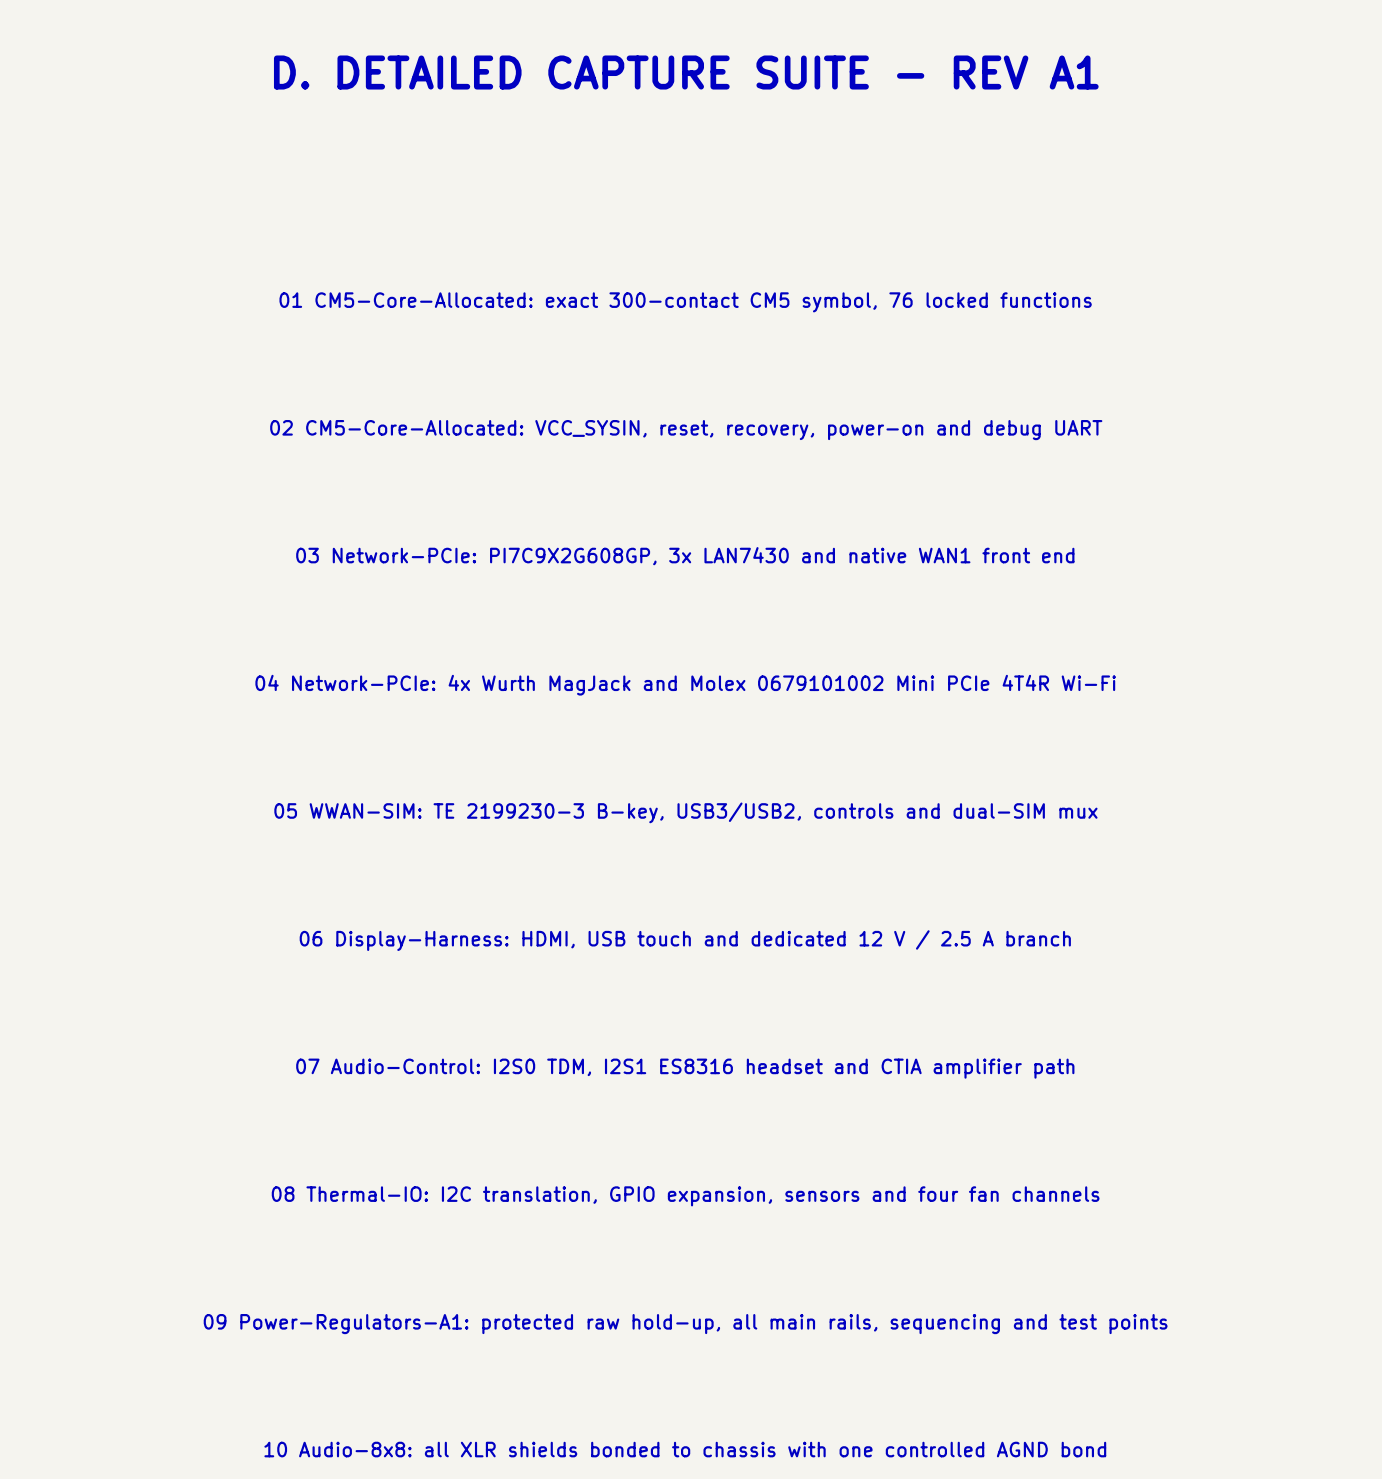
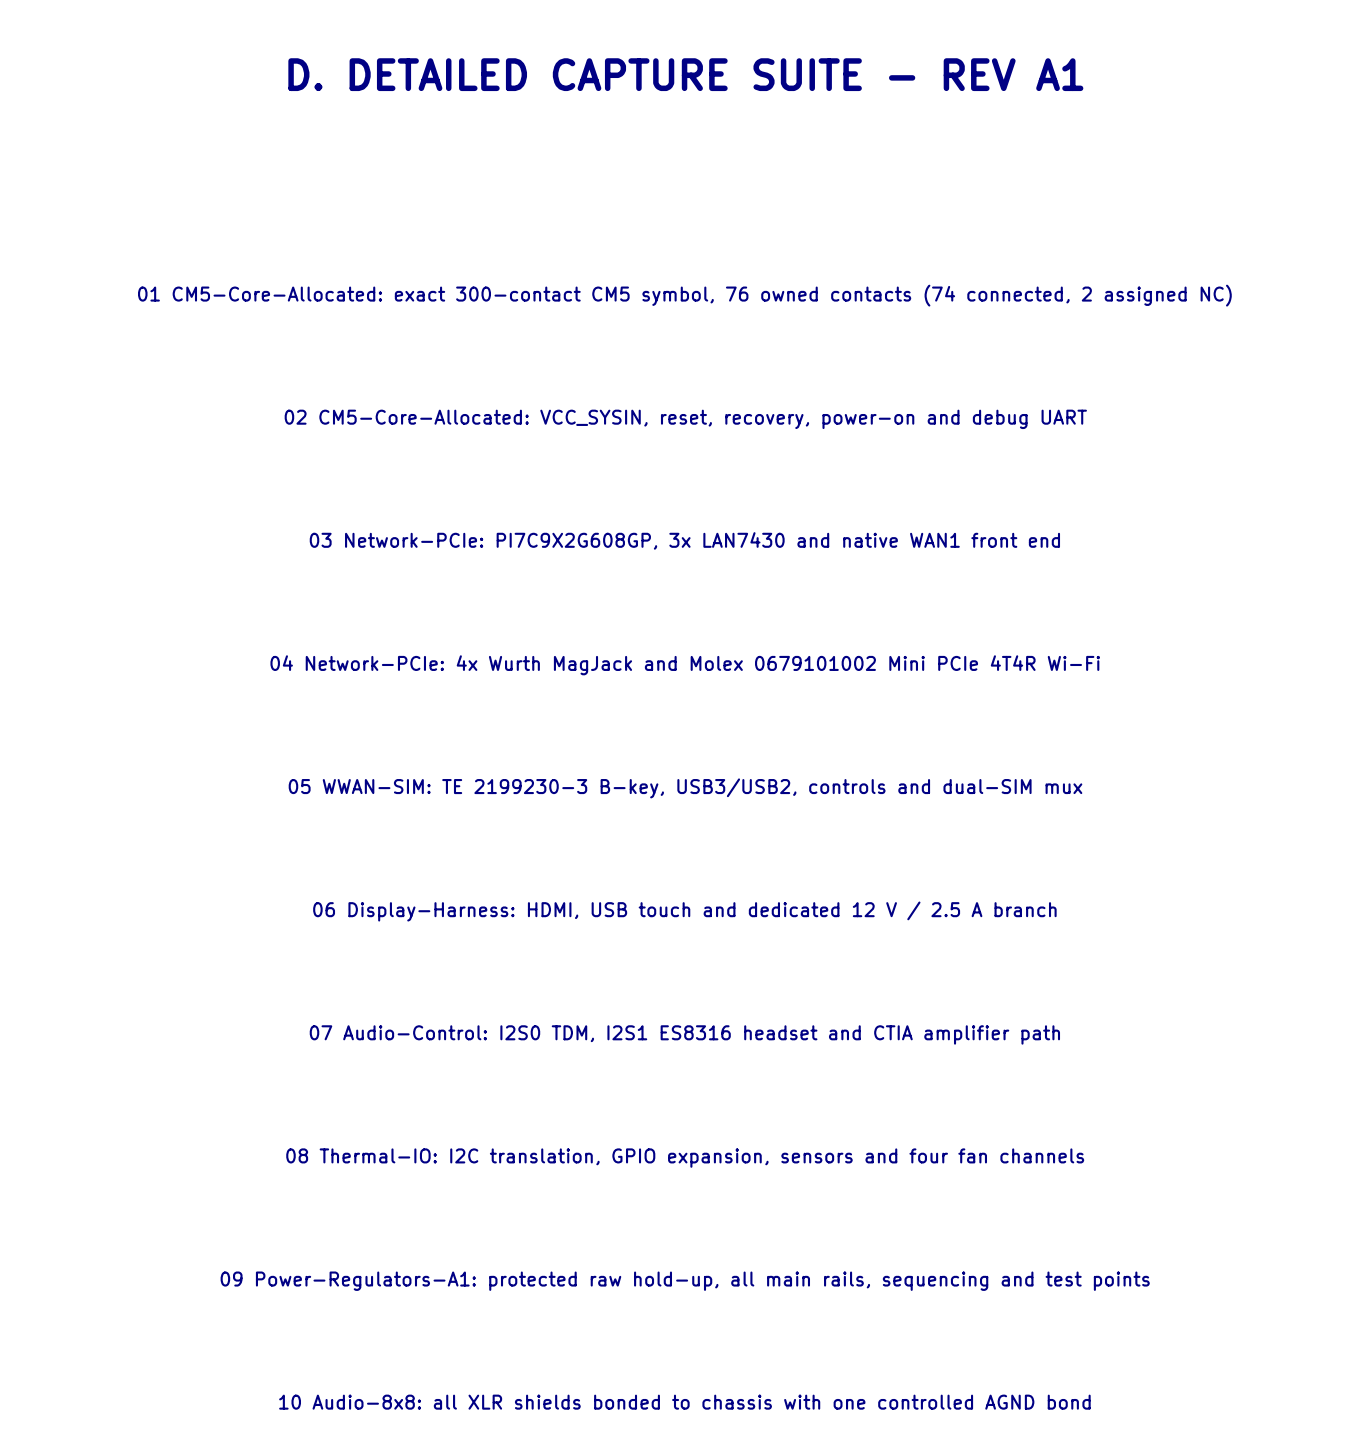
text: 01 CM5-Core-Allocated: exact 300-contact CM5 symbol, 76 locked functions (685, 302) -> 01 CM5-Core-Allocated: exact 300-contact CM5 symbol, 76 owned contacts (74 connected, 2 assigned NC) (684, 295)

